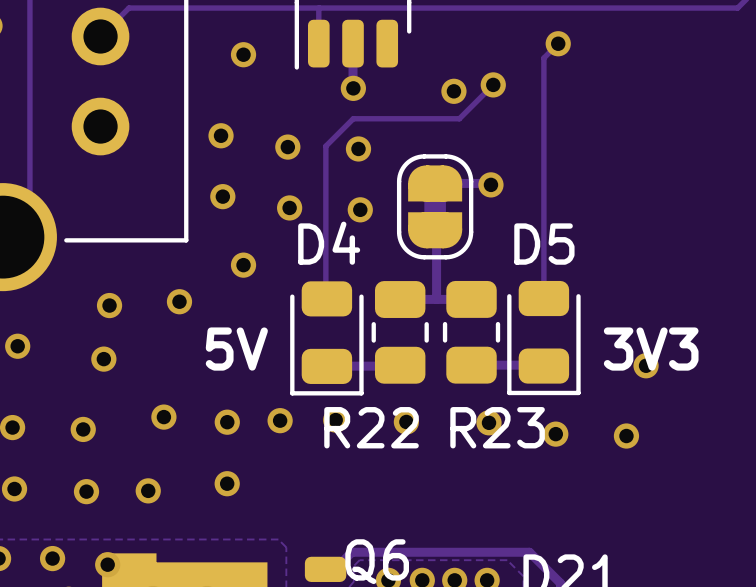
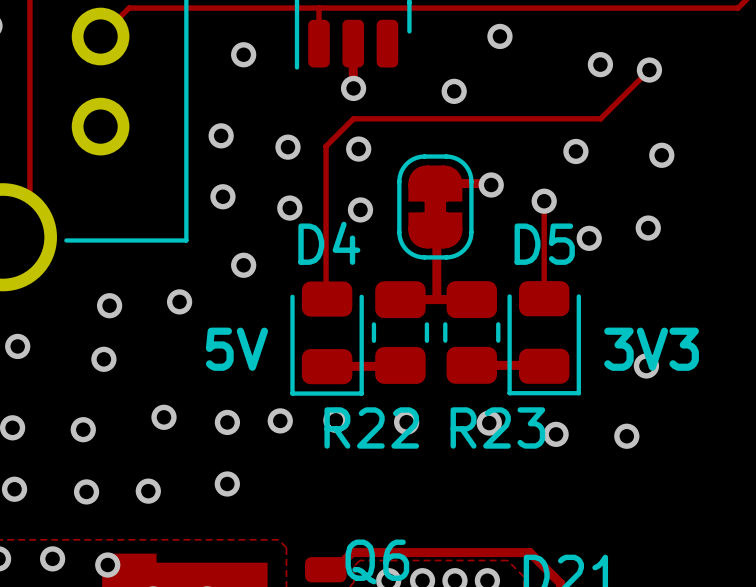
via: none -> (499, 36)
track: (558, 43) (543, 58) (543, 201) -> none
via: (558, 43) -> none
via: none -> (600, 64)
via: none -> (649, 70)
track: (493, 84) (459, 118) -> (649, 70) (600, 118) (459, 118)
via: (493, 84) -> none
via: none -> (575, 151)
via: none -> (661, 155)
via: none -> (544, 201)
via: none -> (648, 228)
via: none -> (589, 238)

